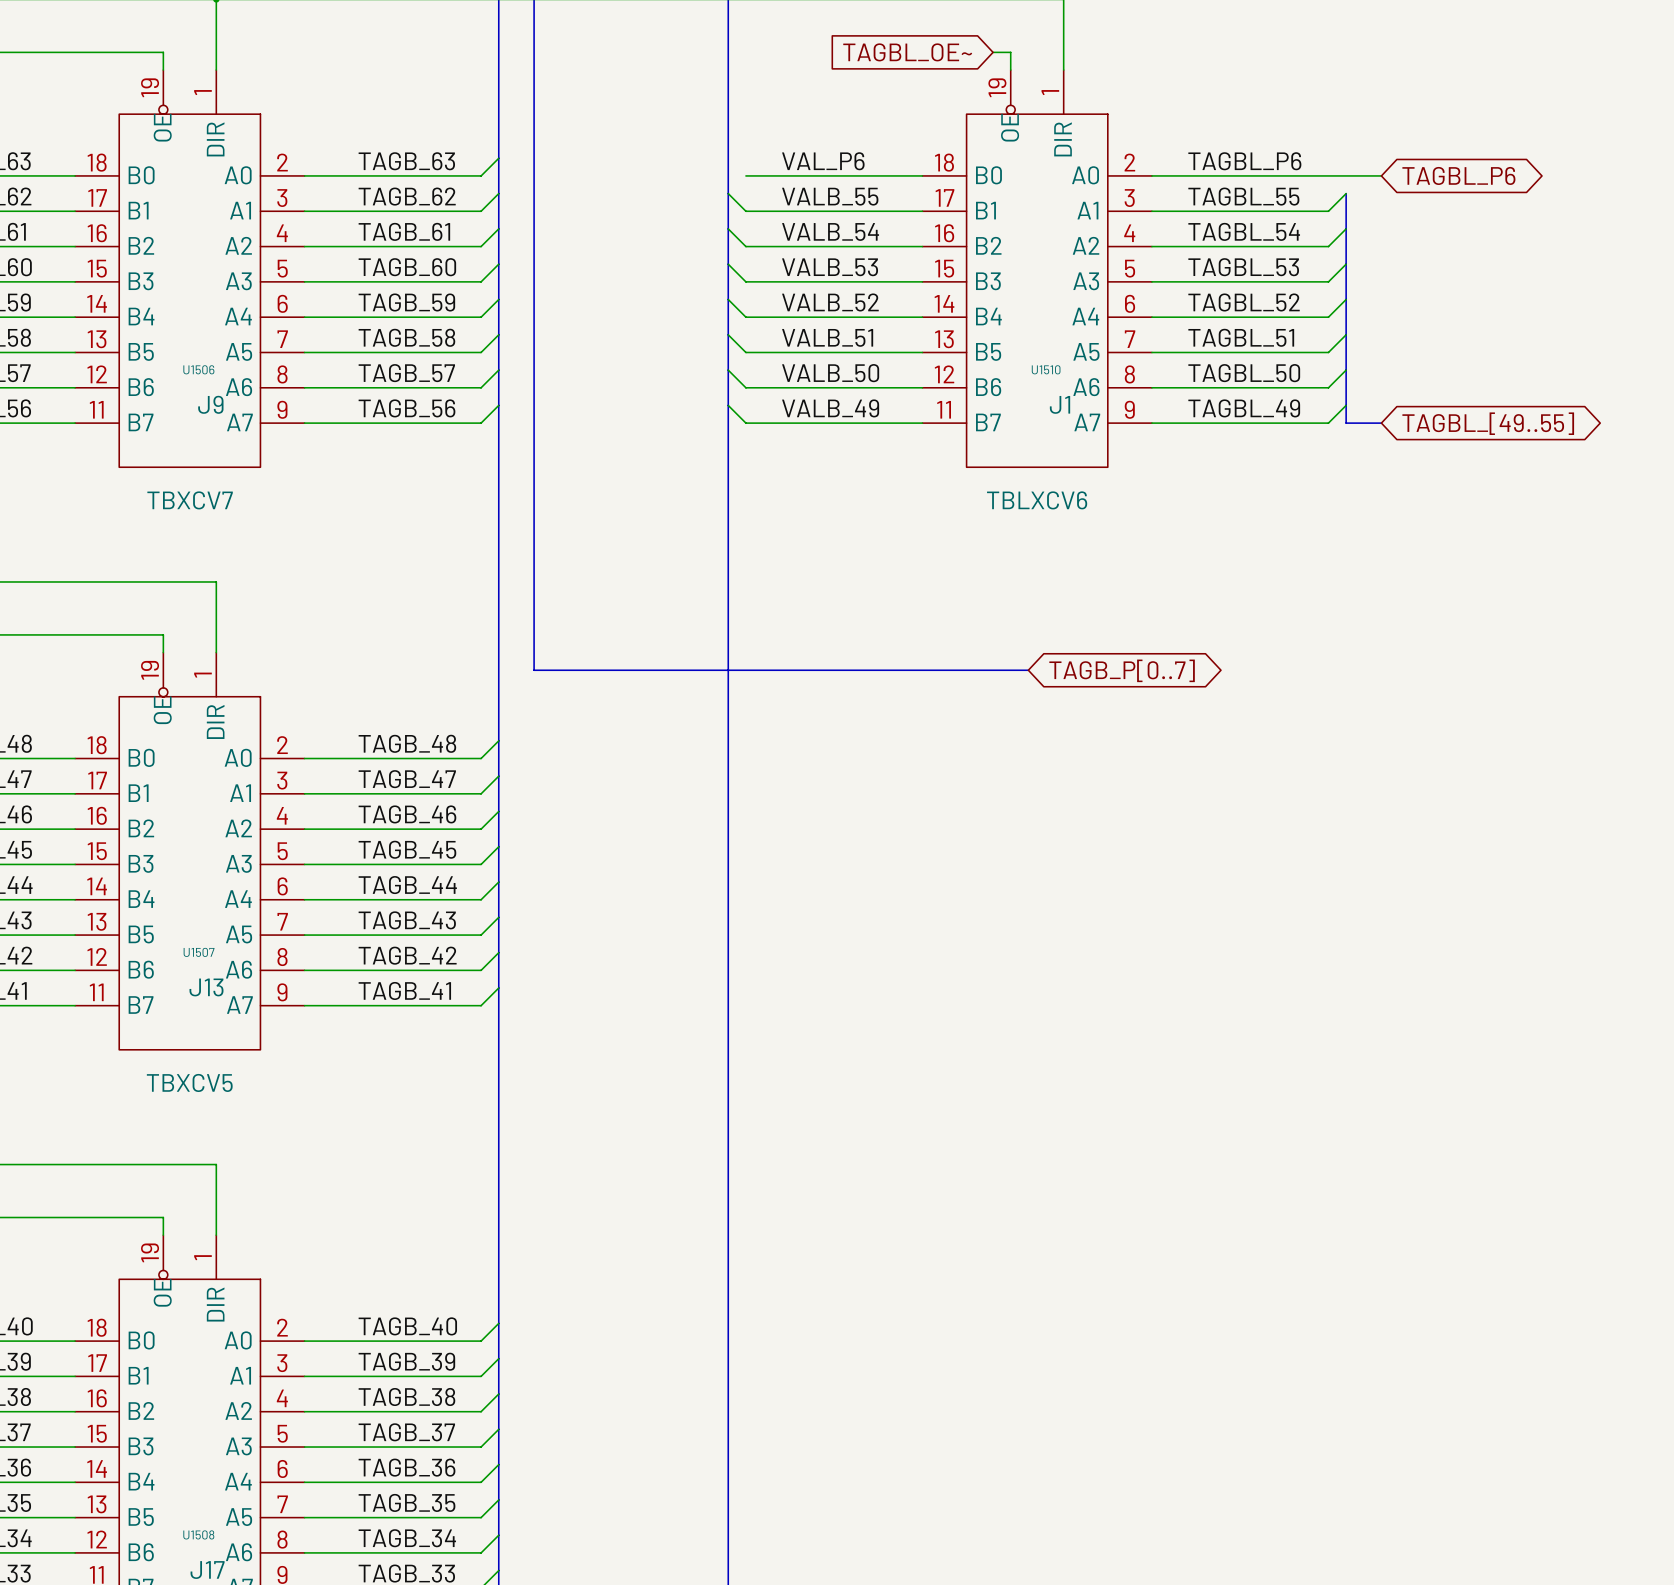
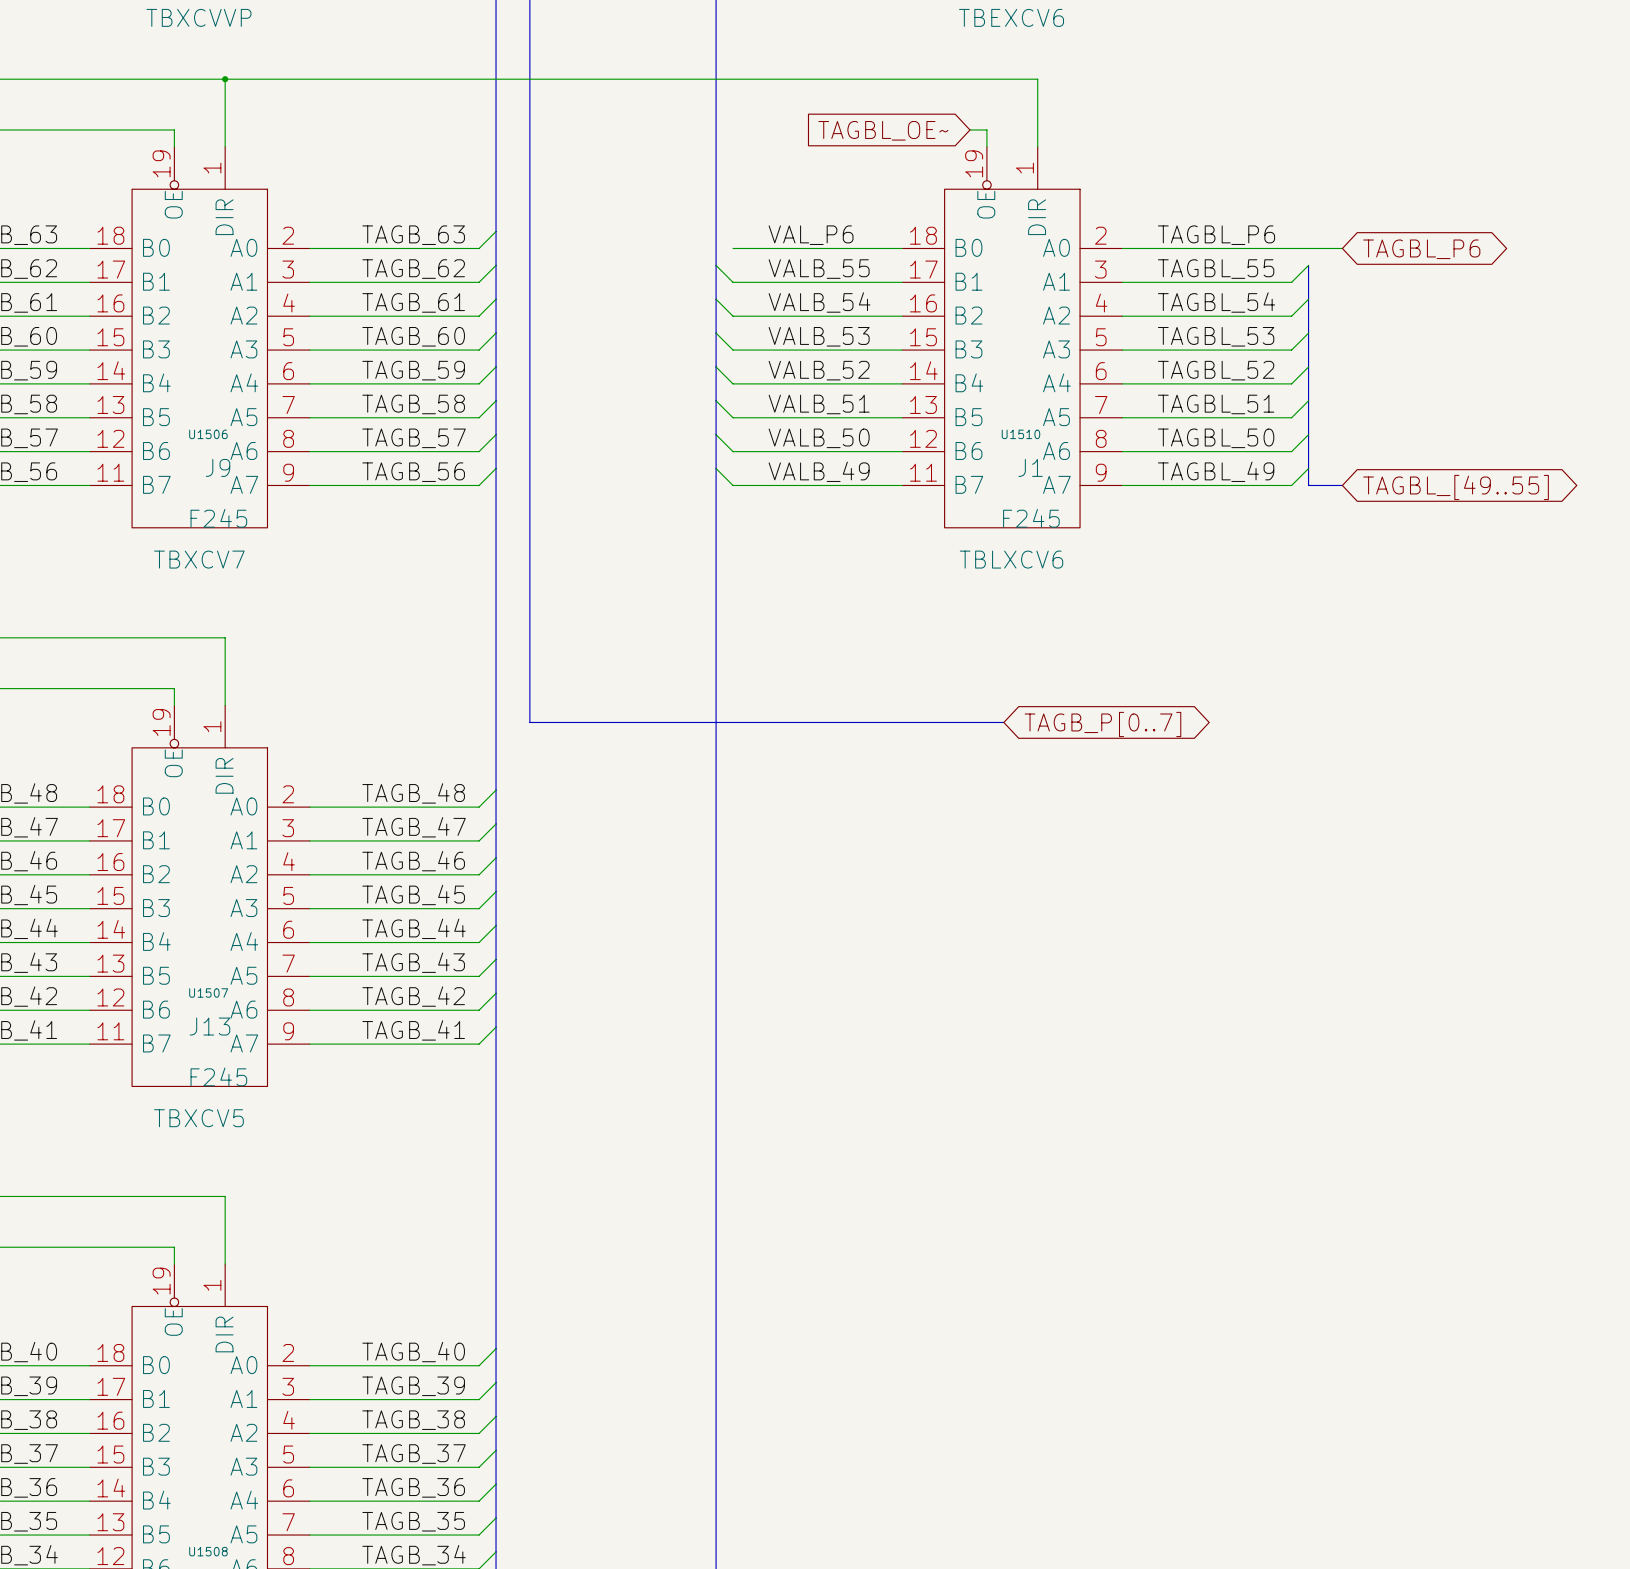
U1506 value: none -> F245 (218, 518)
U1510 value: none -> F245 (1031, 518)
U1507 value: none -> F245 (218, 1076)

